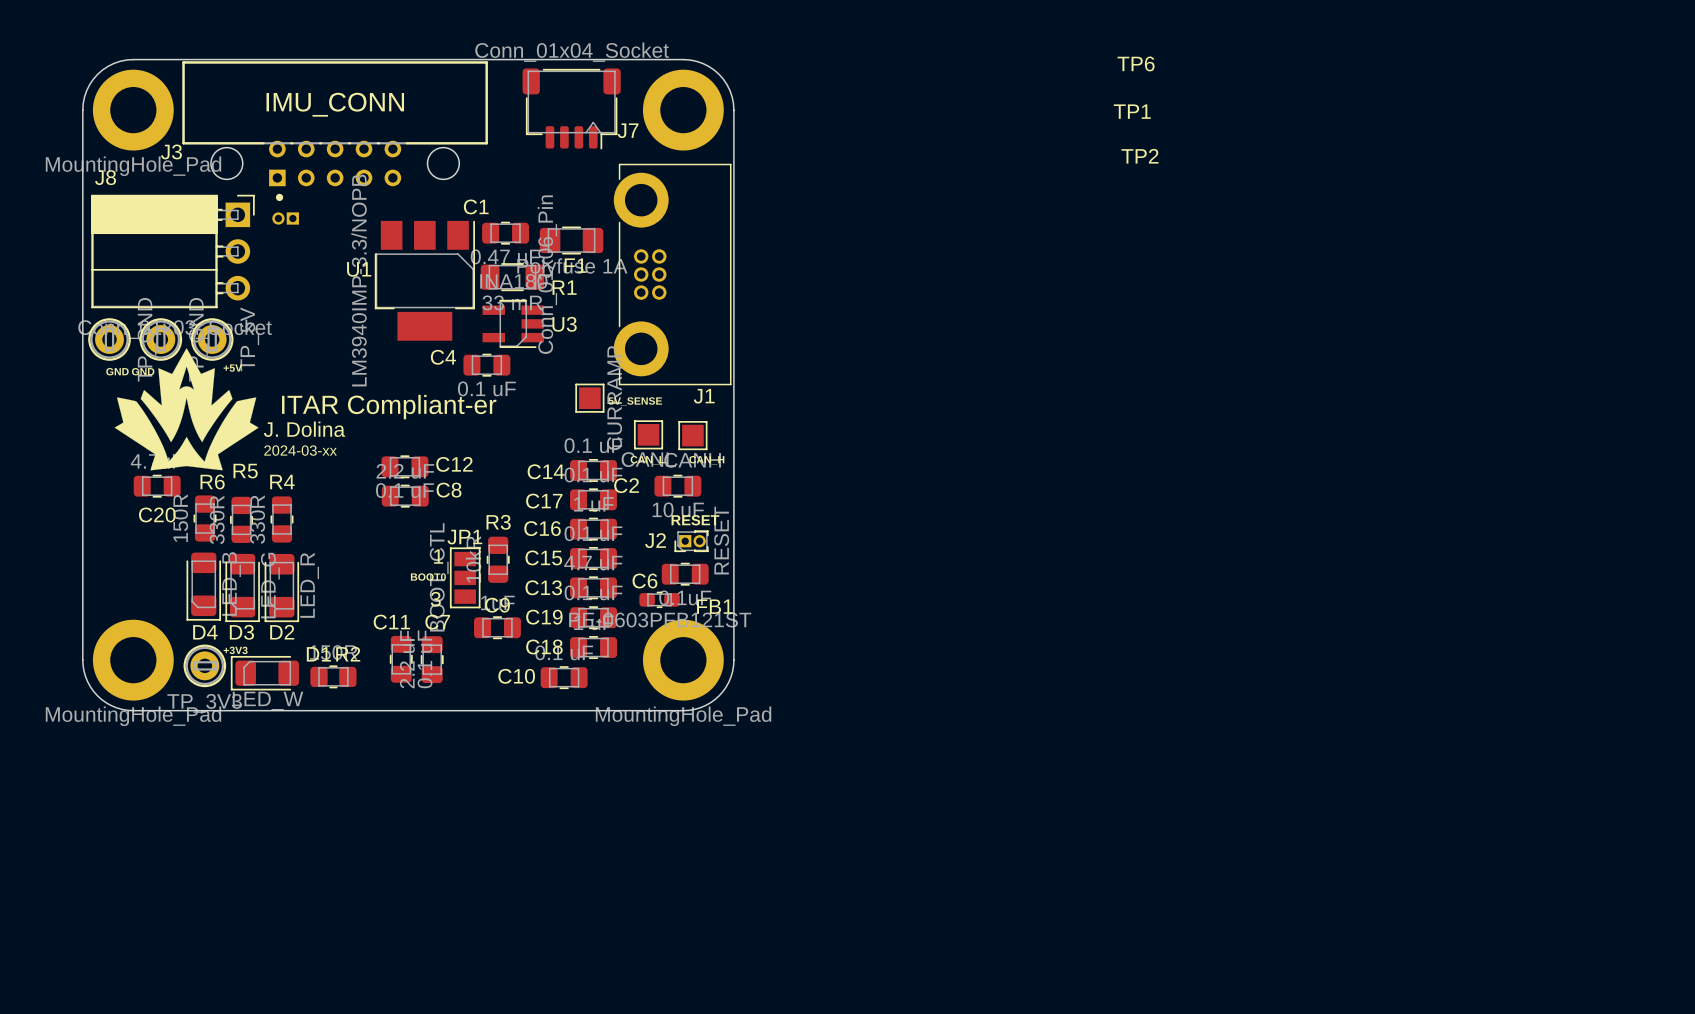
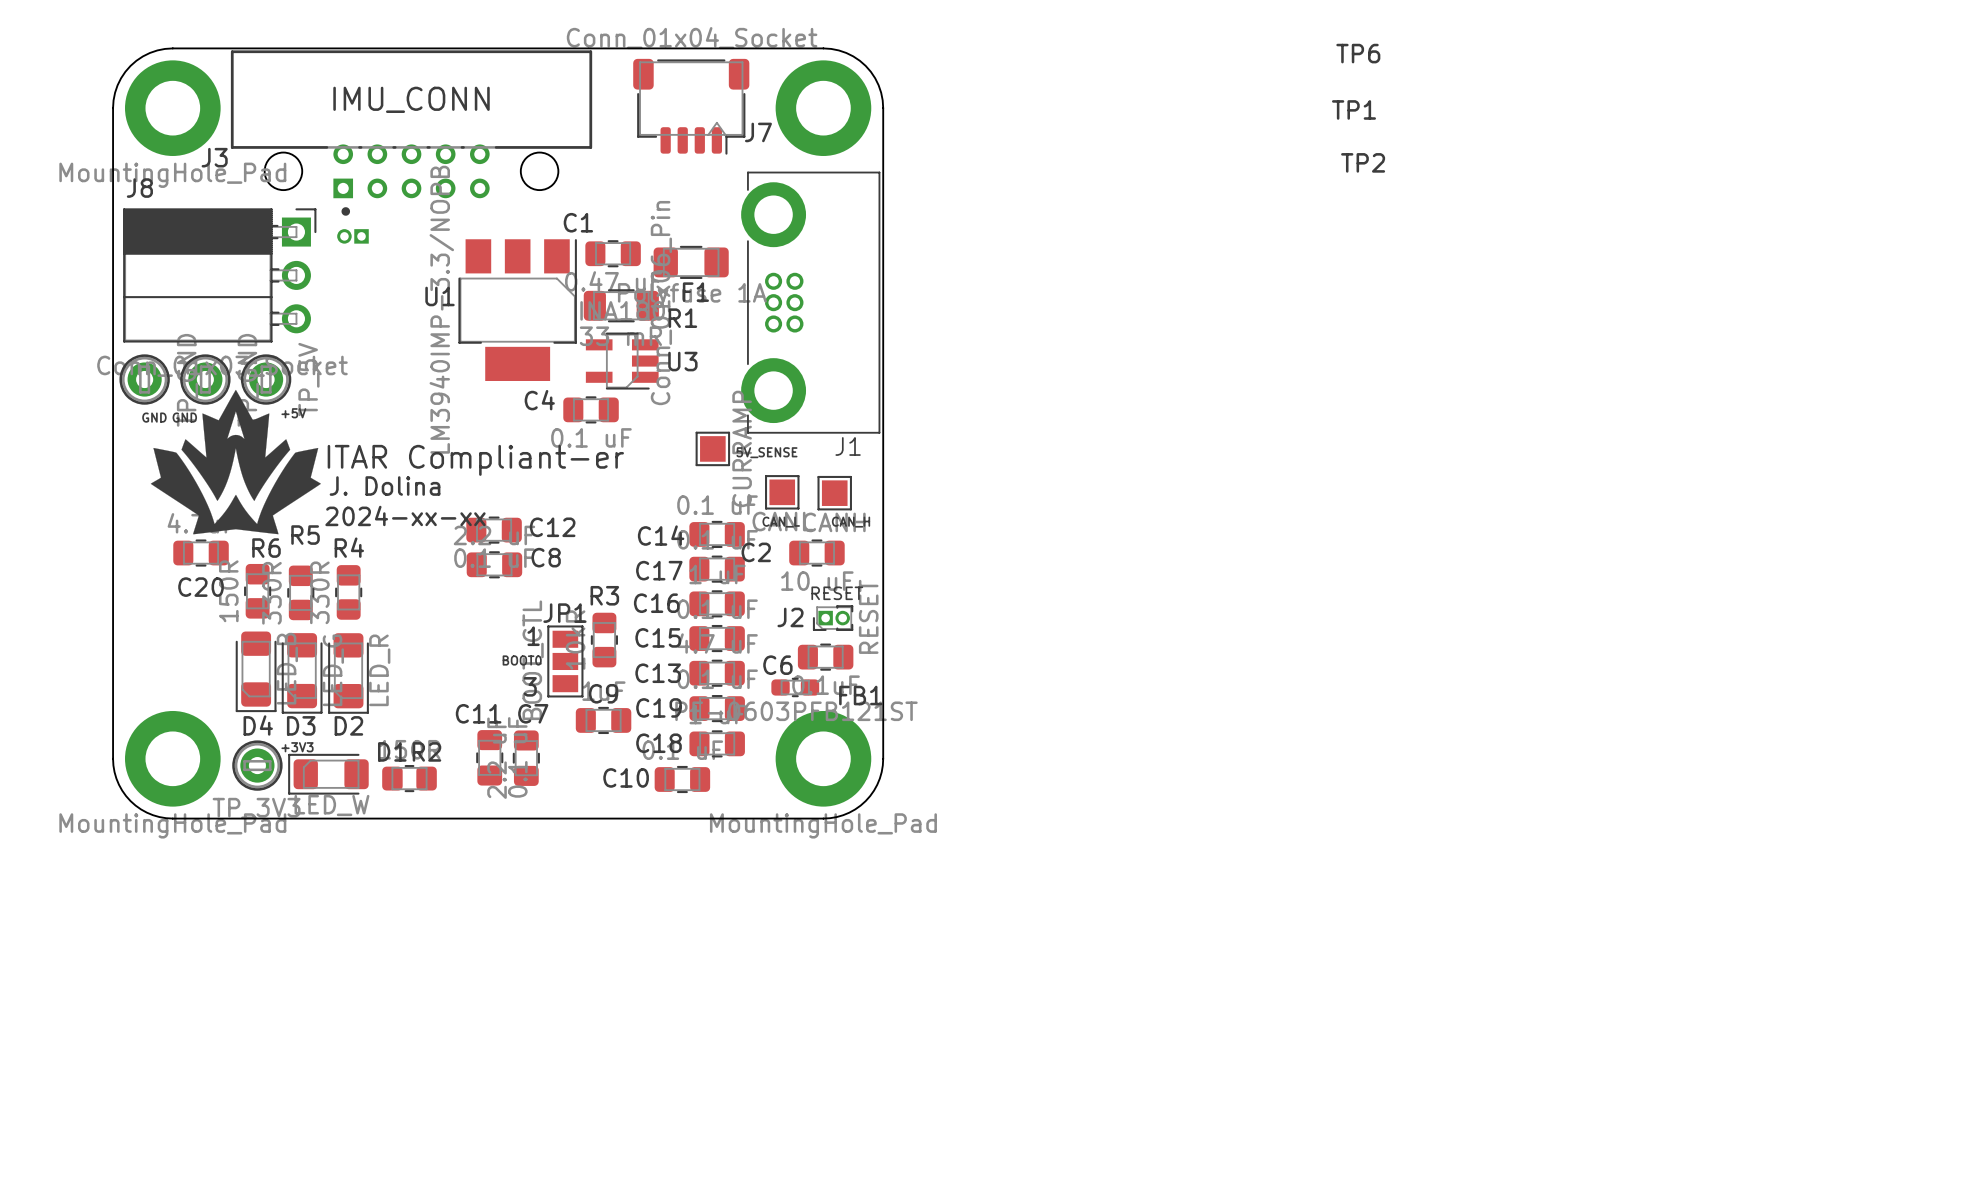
text: 2024-03-xx (300, 450) -> 2024-xx-xx (405, 515)

